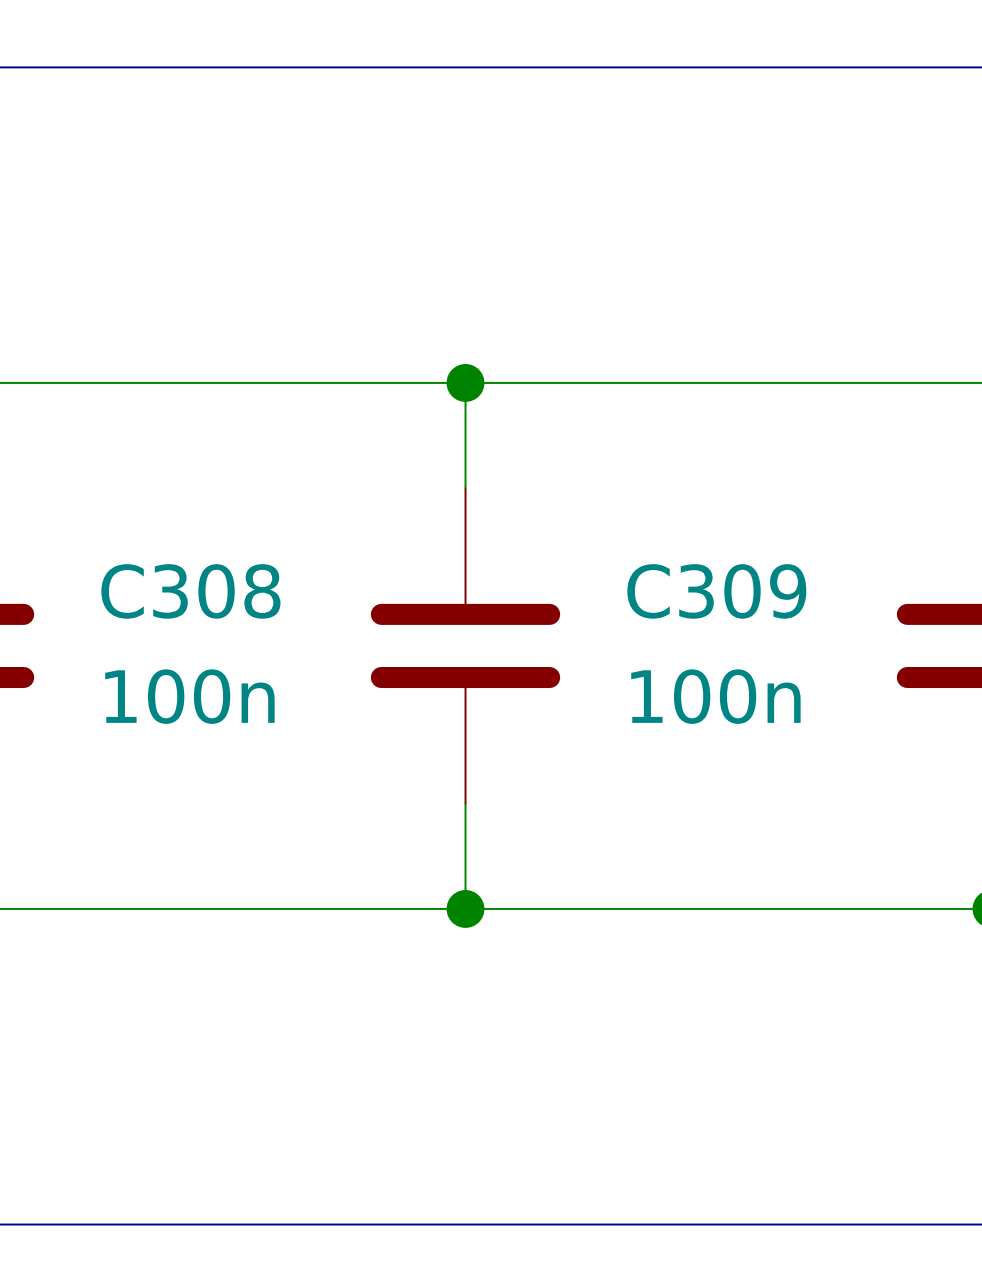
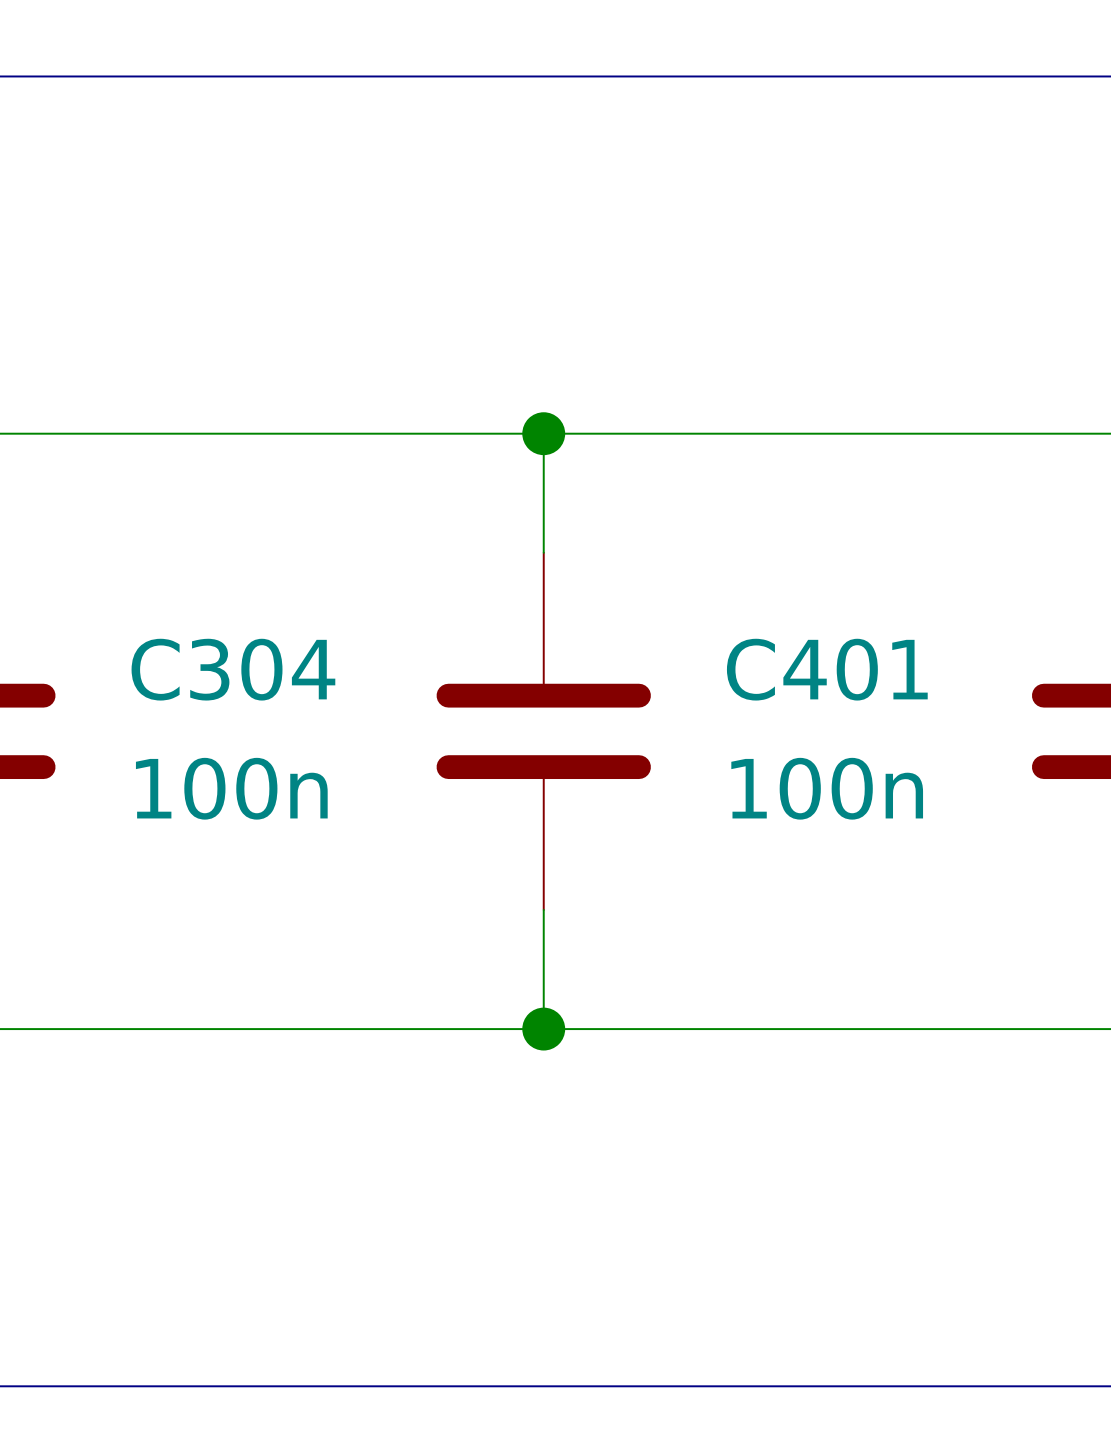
C308 name: C308 (190, 591) -> C304 (233, 669)
C309 name: C309 (716, 591) -> C401 (827, 669)

